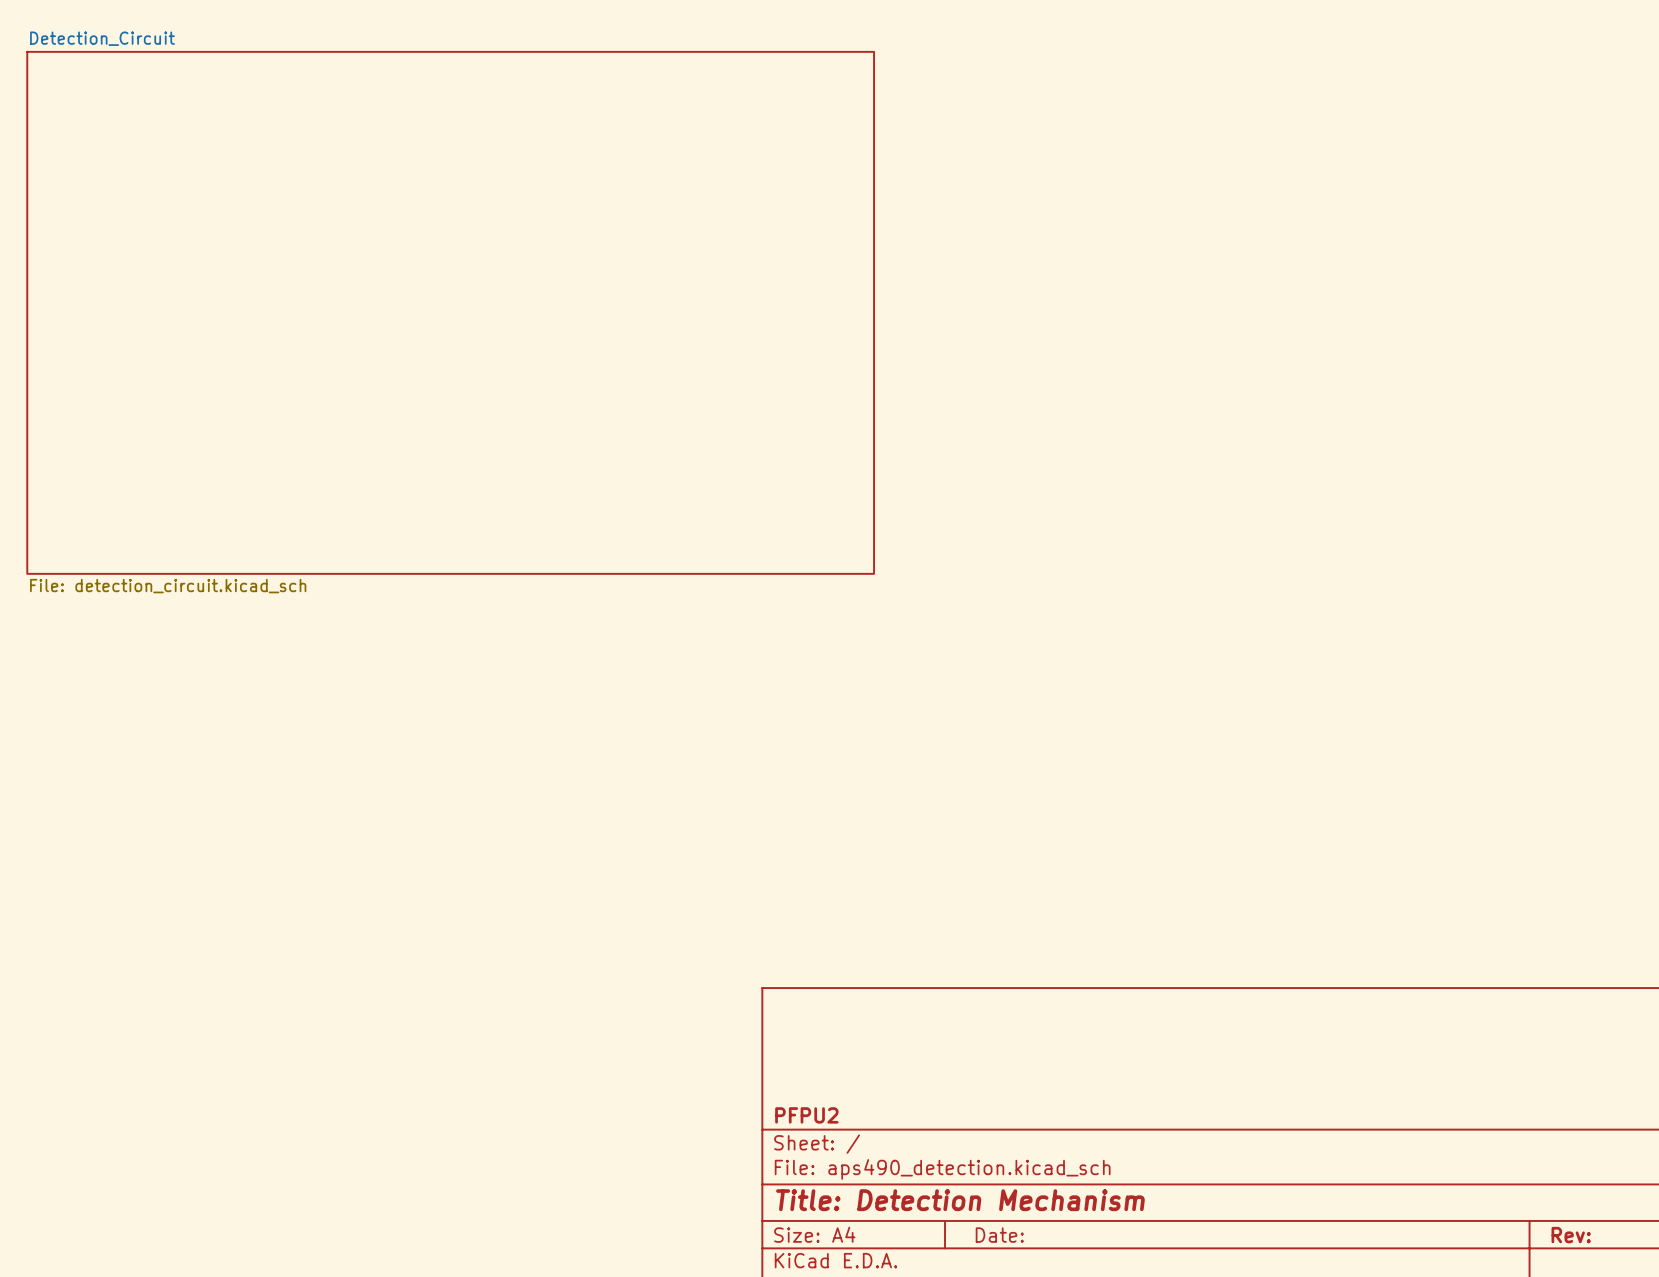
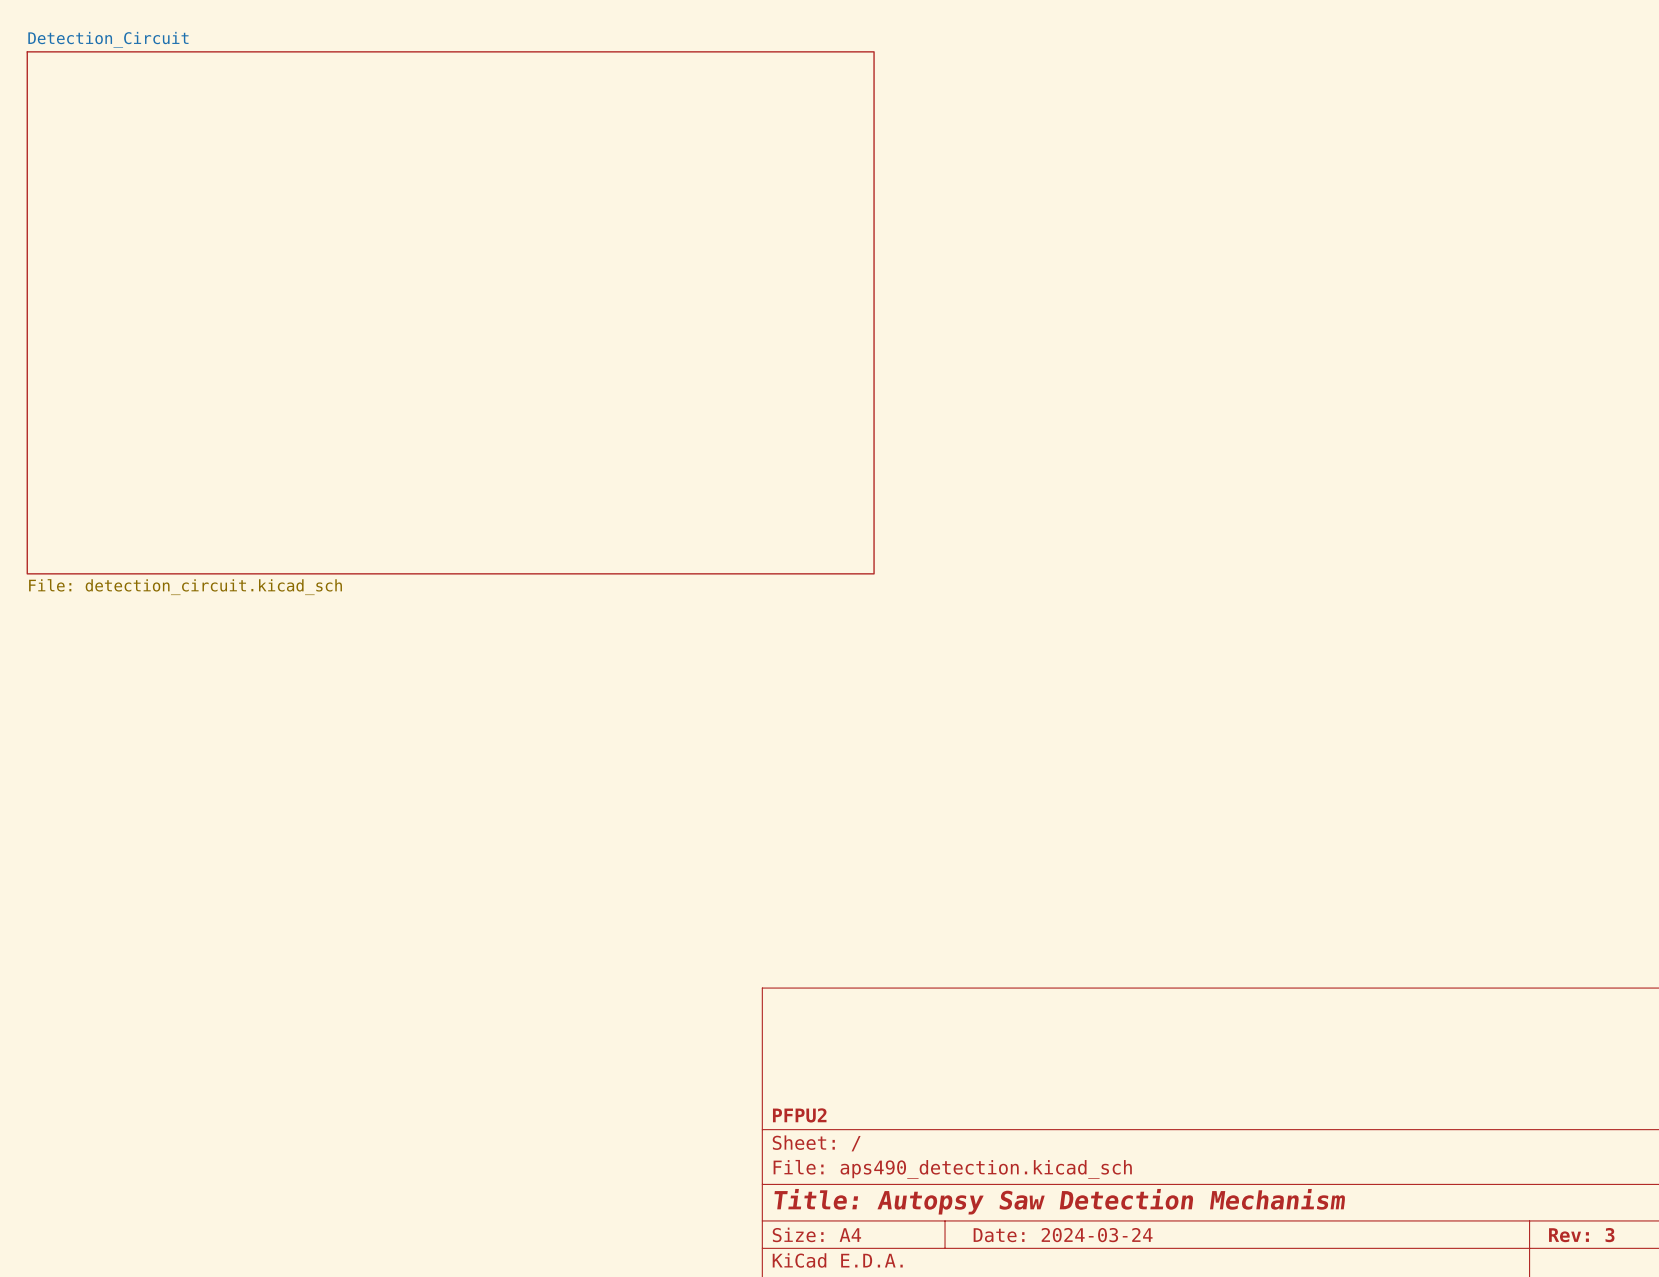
title block: Title: Detection Mechanism (960, 1200) -> Title: Autopsy Saw Detection Mechanism (1059, 1201)
title block: Date: (999, 1235) -> Date: 2024-03-24 (1063, 1235)
title block: Rev: (1571, 1235) -> Rev: 3 (1581, 1235)

